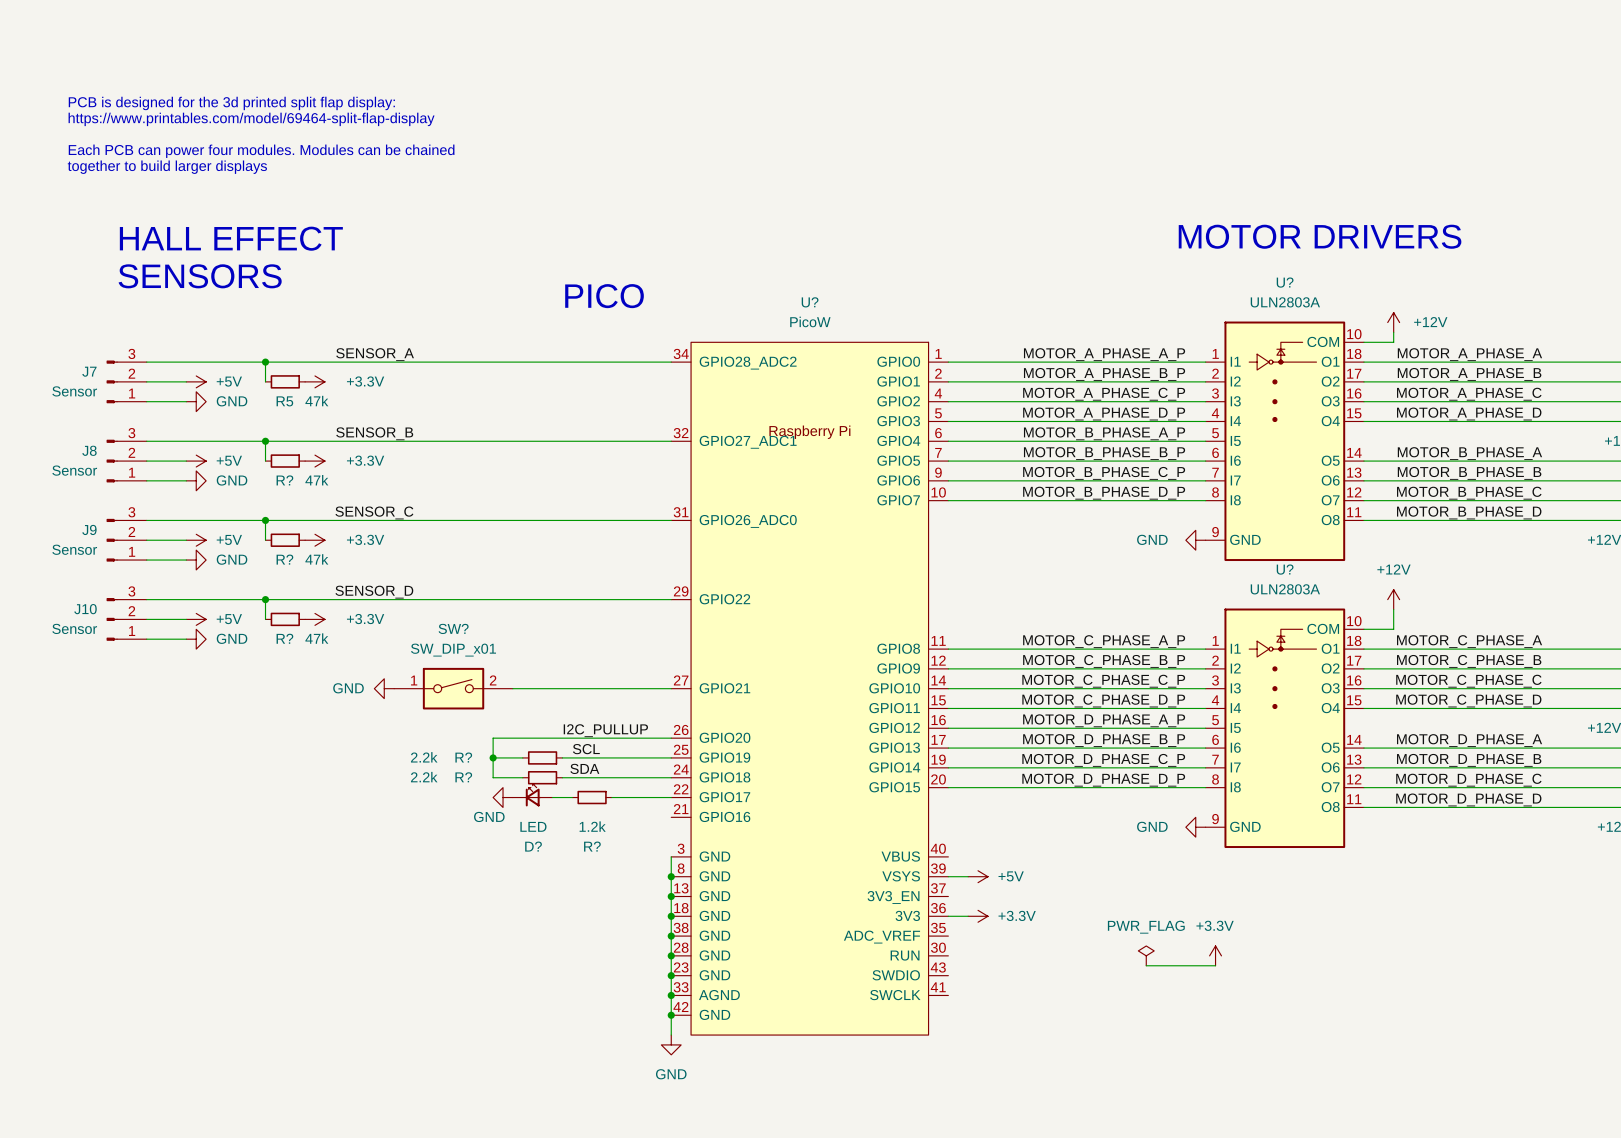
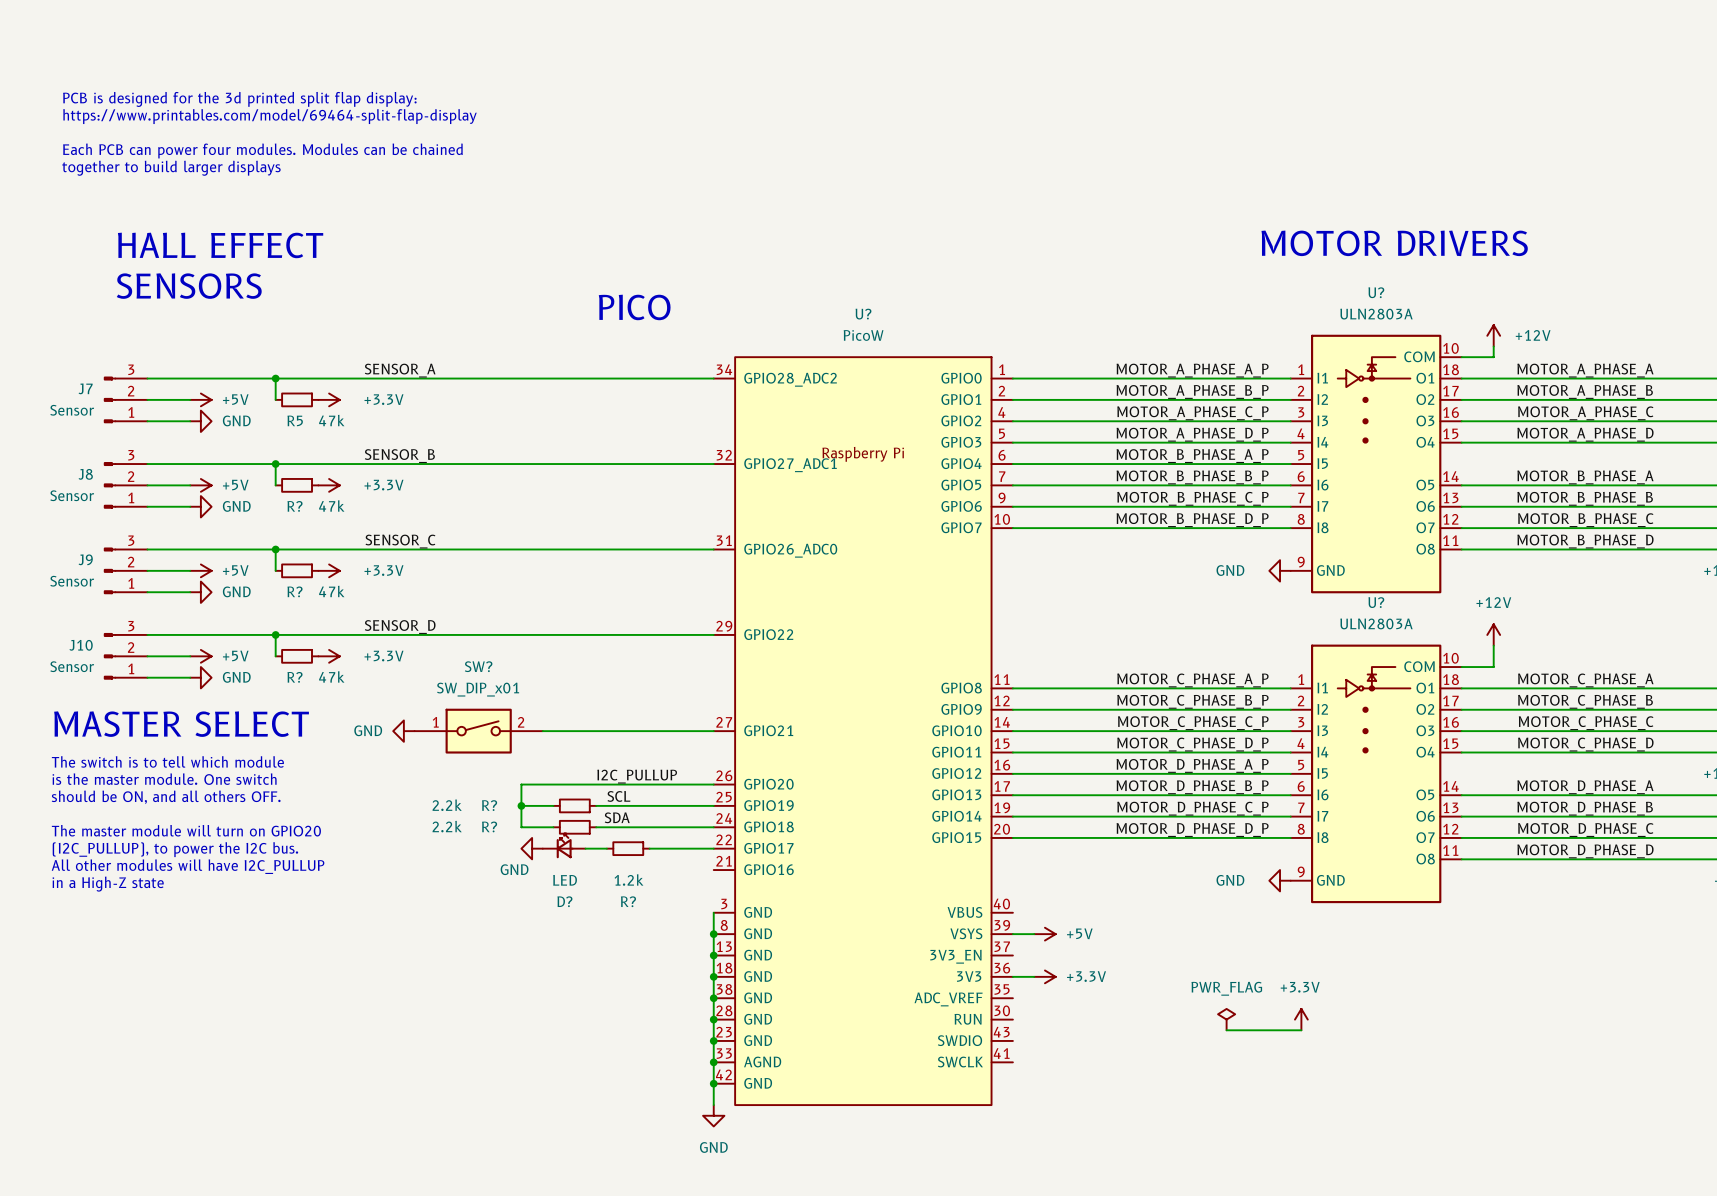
text: none -> MASTER SELECT (181, 724)
text: none -> The switch is to tell which module (167, 761)
text: none -> is the master module. One switch (164, 779)
text: none -> should be ON, and all others OFF. (166, 797)
text: none -> The master module will turn on GPIO20 (186, 830)
text: none -> (I2C_PULLUP), to power the I2C bus. (175, 849)
text: none -> All other modules will have I2C_PULLUP (188, 866)
text: none -> in a High-Z state (108, 884)

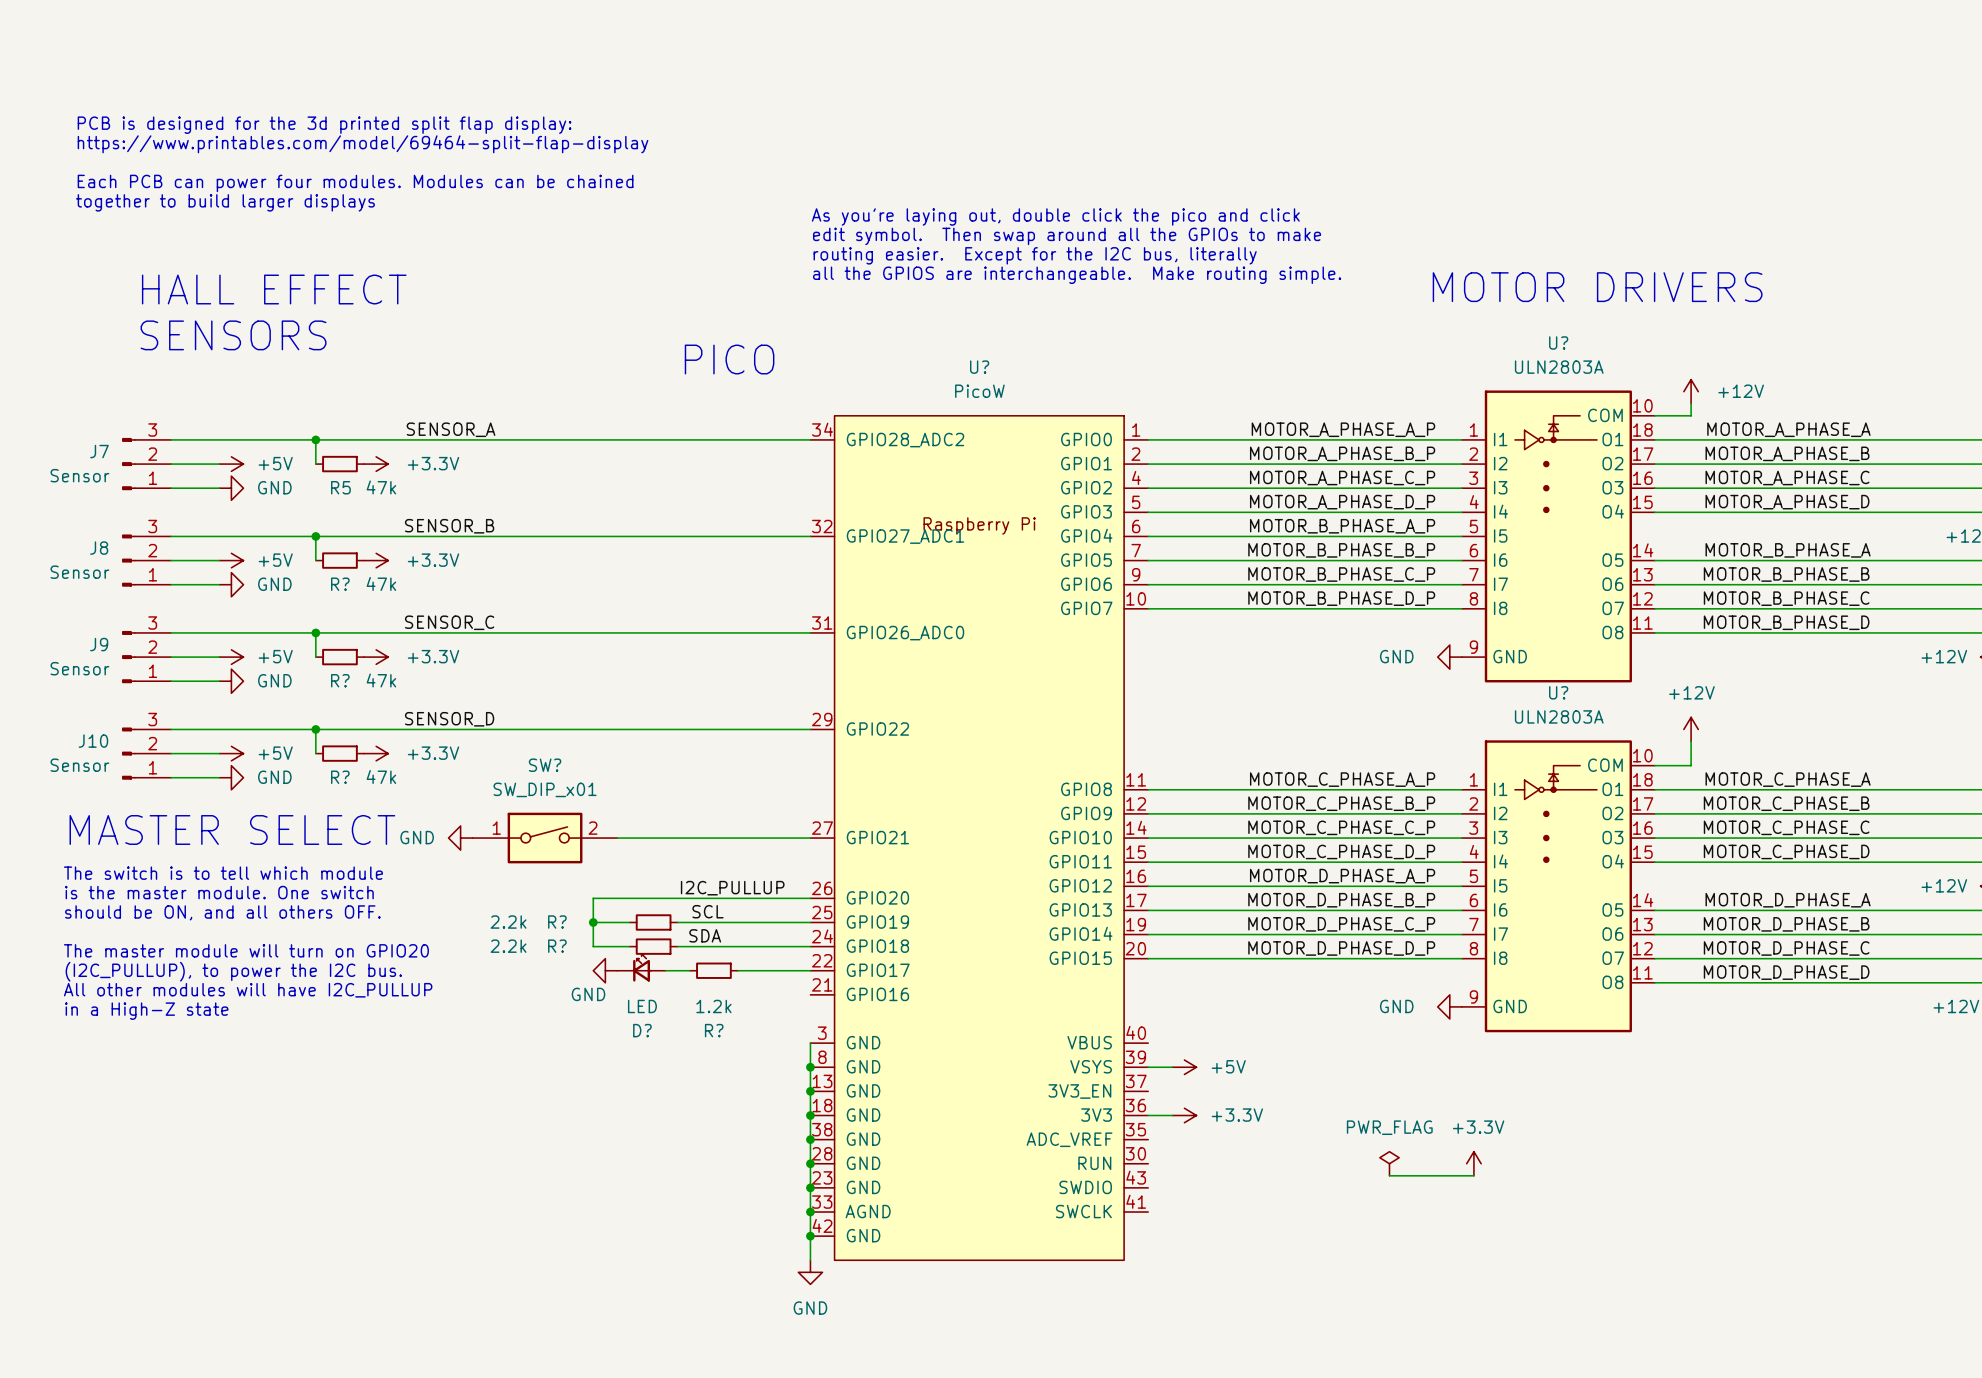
text: none -> As you're laying out, double click the pico and click (1055, 216)
text: none -> edit symbol. Then swap around all the GPIOs to make (1067, 236)
text: none -> routing easier. Except for the I2C bus, literally (1035, 255)
text: none -> all the GPIOS are interchangeable. Make routing simple. (1077, 275)

